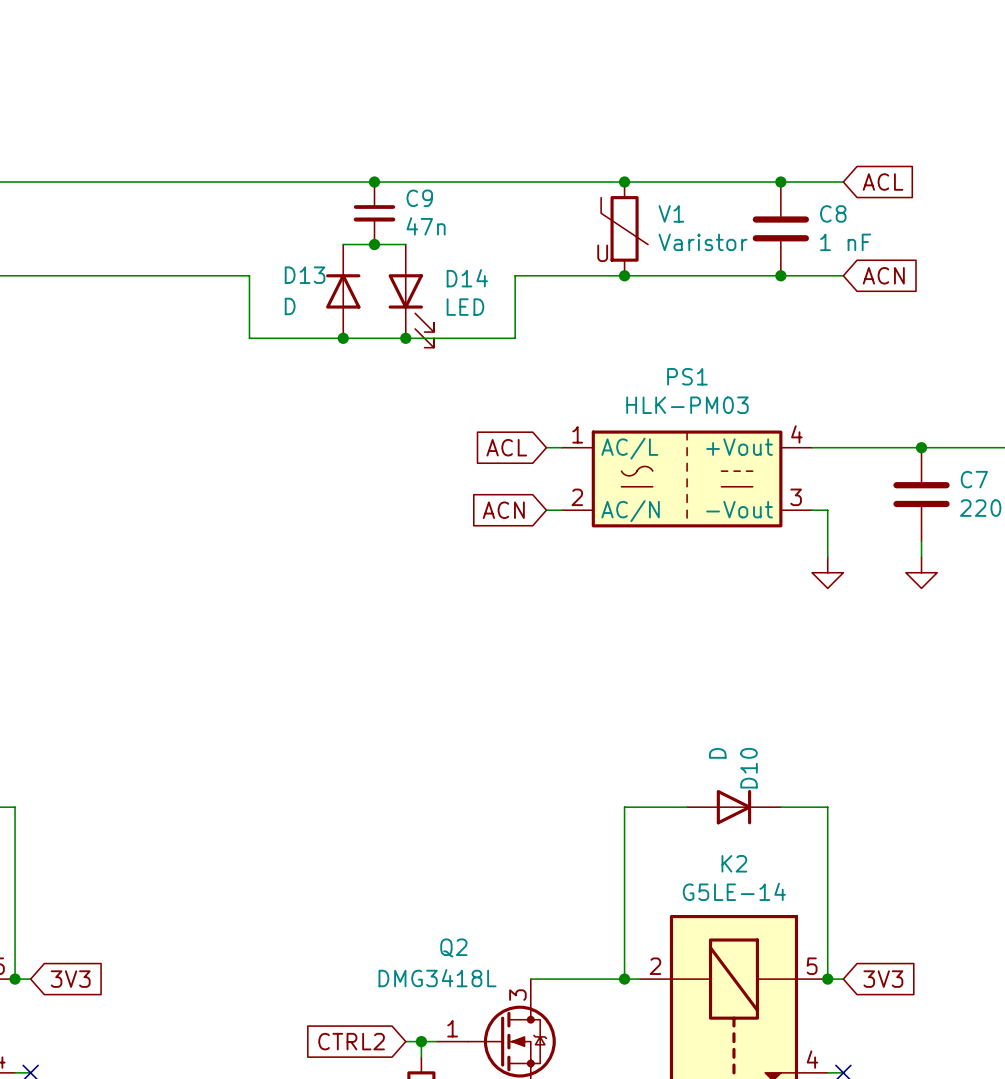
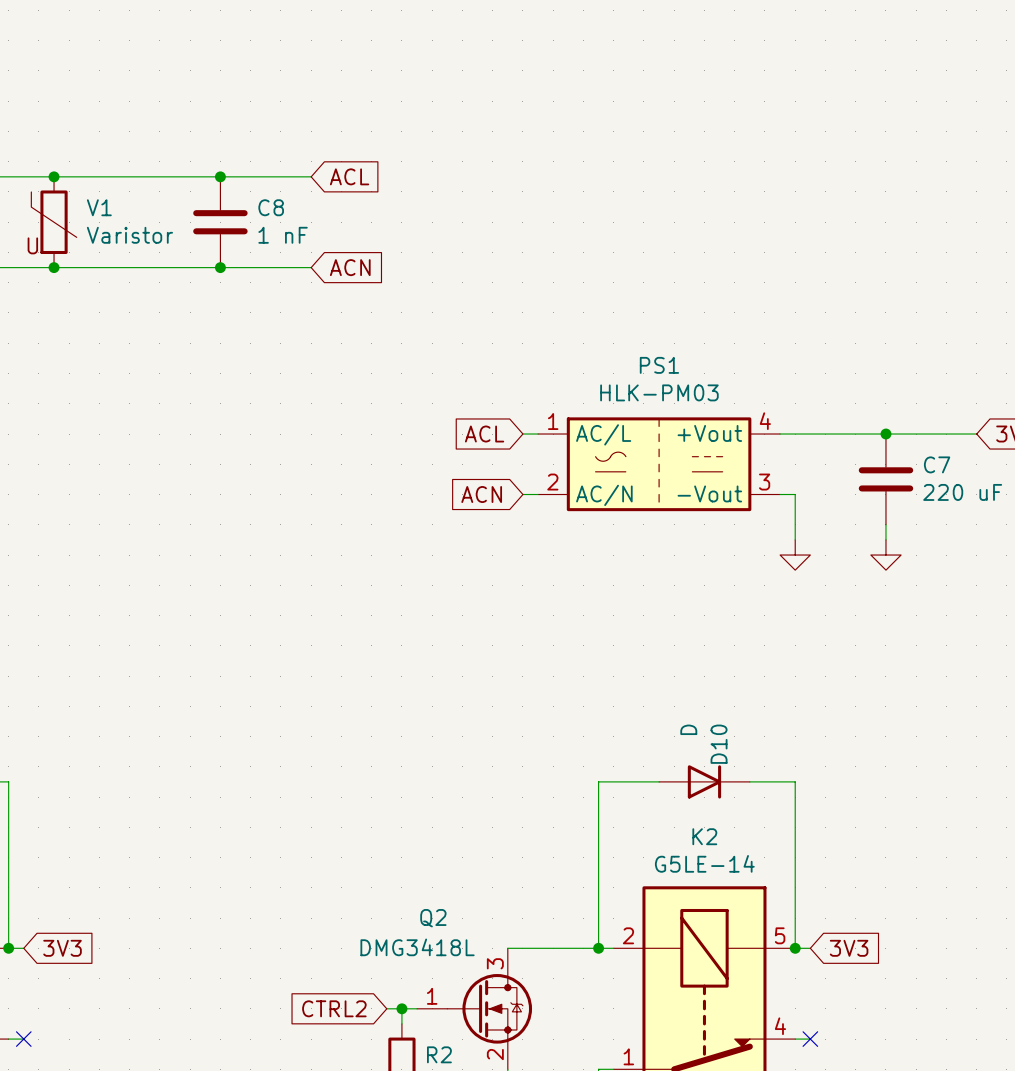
junction: none -> (54, 176)
junction: none -> (220, 176)
wire: (327, 182) (843, 182) -> none
global label: none -> ACL (349, 176)
junction: (374, 182) -> none
junction: (624, 182) -> none
junction: (780, 182) -> none
global label: ACL (883, 182) -> none
C9: 47n (374, 213) -> none
V1 position: (624, 228) -> (54, 222)
C8 position: (780, 228) -> (220, 222)
wire: (343, 244) (405, 244) -> none
junction: (374, 244) -> none
junction: none -> (54, 267)
junction: none -> (220, 267)
wire: (249, 275) (249, 338) (515, 338) (515, 275) (843, 275) -> (235, 267) (311, 267)
global label: none -> ACN (350, 267)
junction: (624, 275) -> none
junction: (780, 275) -> none
global label: ACN (883, 275) -> none
D13: D (343, 291) -> none
D14: LED (411, 296) -> none
junction: (343, 338) -> none
junction: (405, 338) -> none

